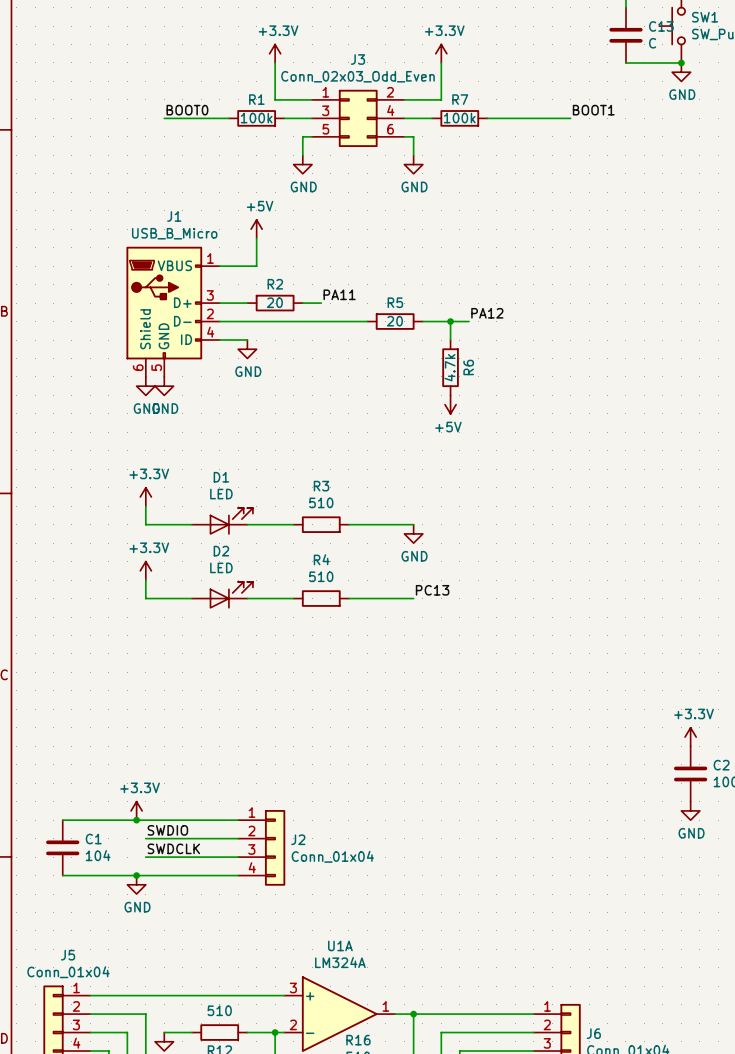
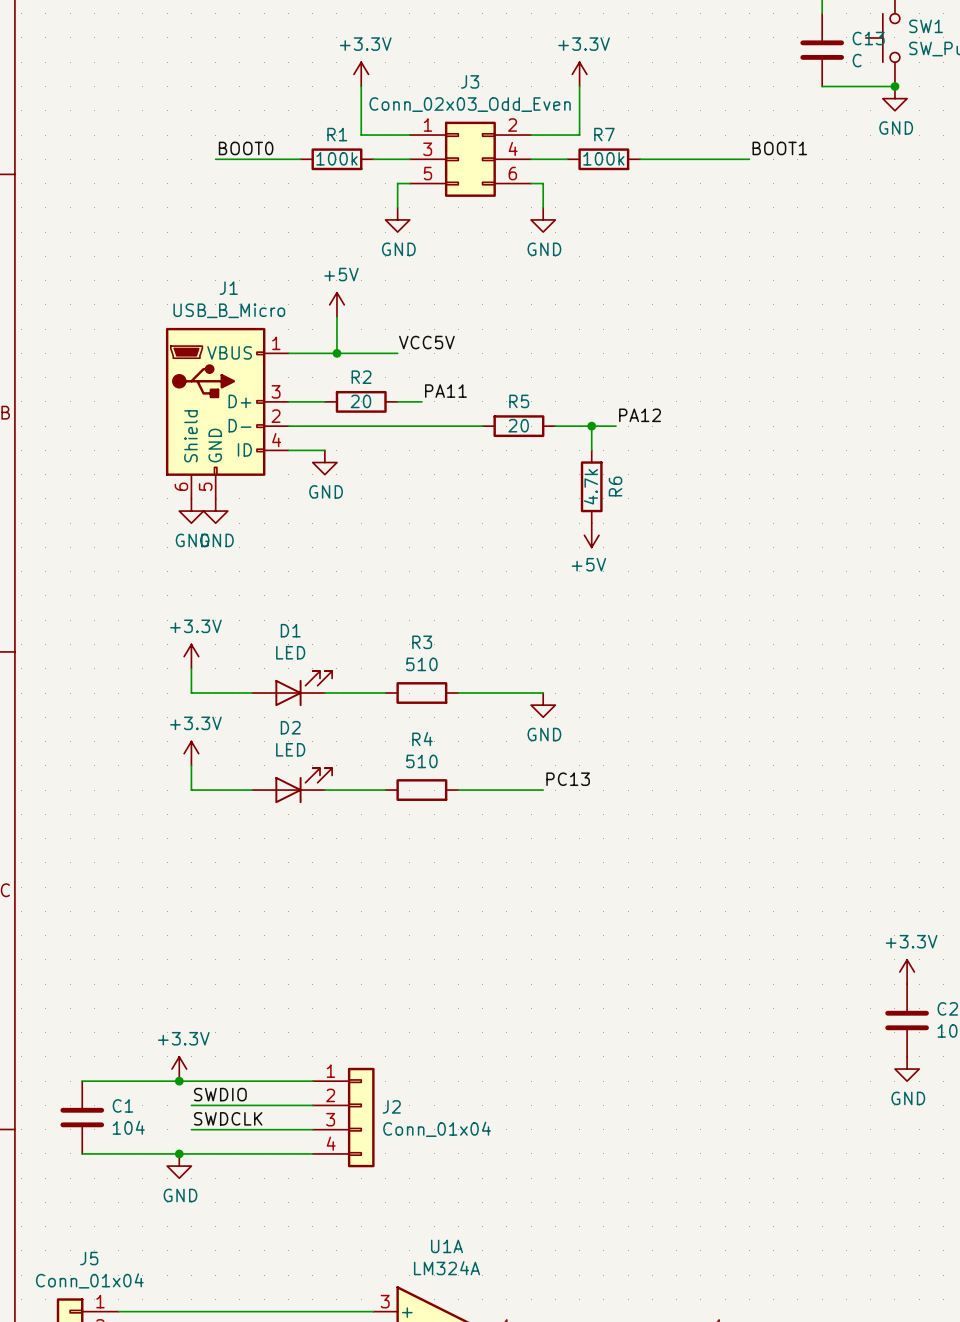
label: none -> VCC5V (426, 342)
wire: none -> (336, 353) (397, 353)
junction: none -> (336, 353)

